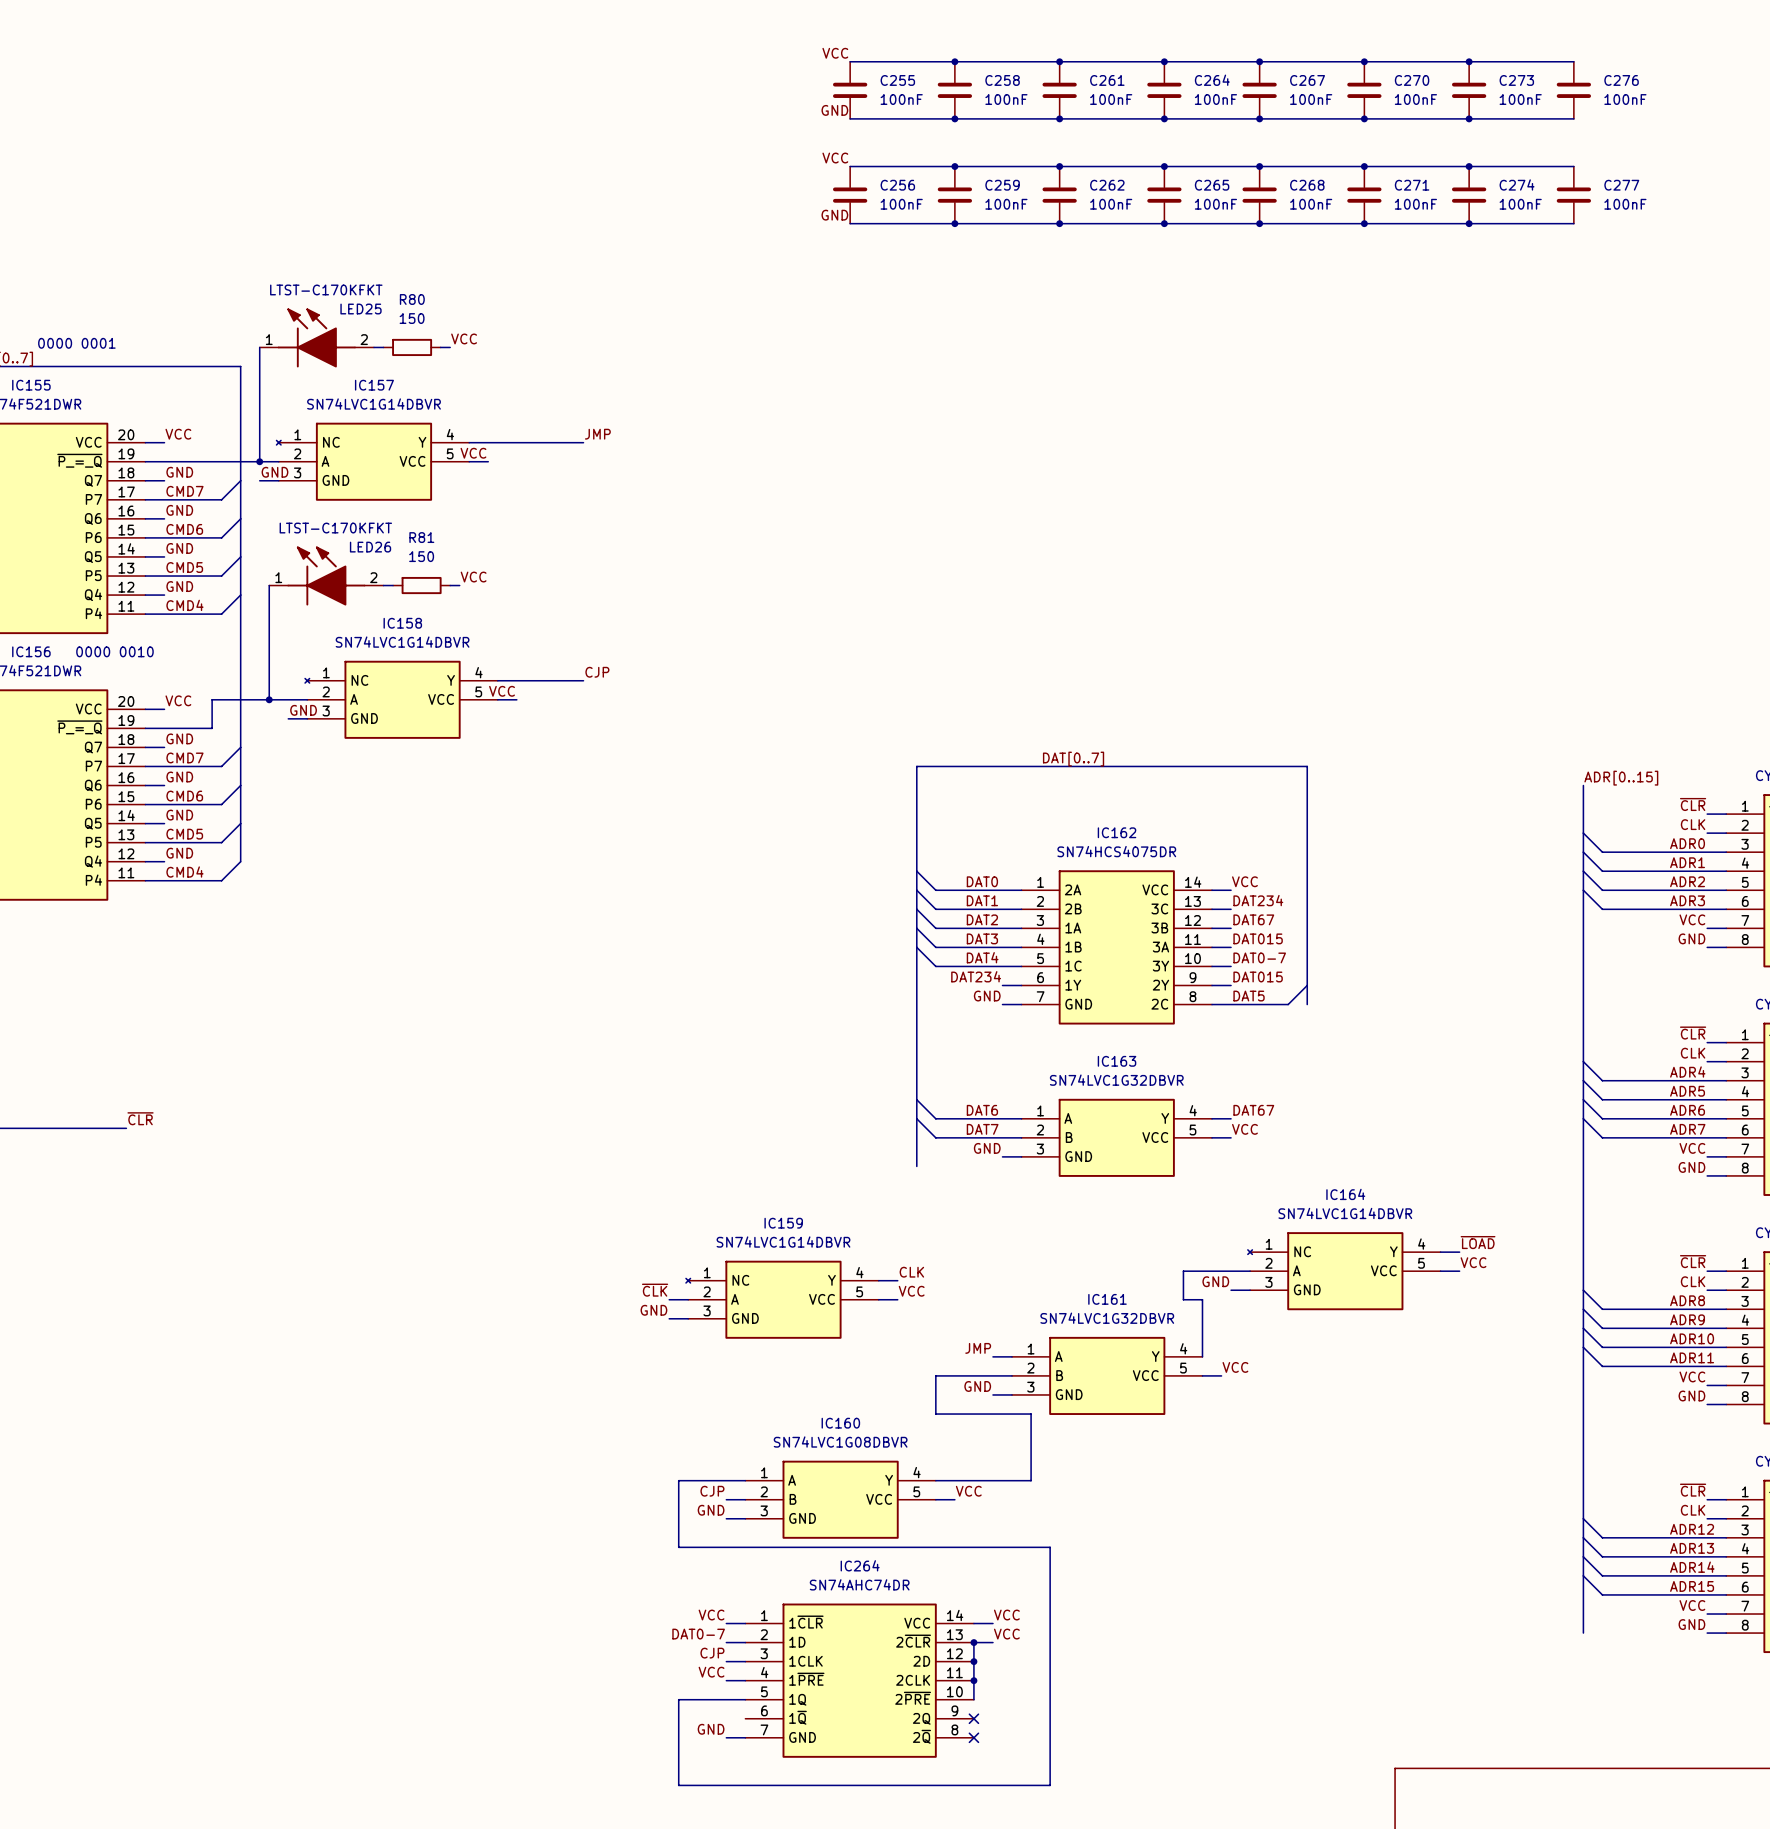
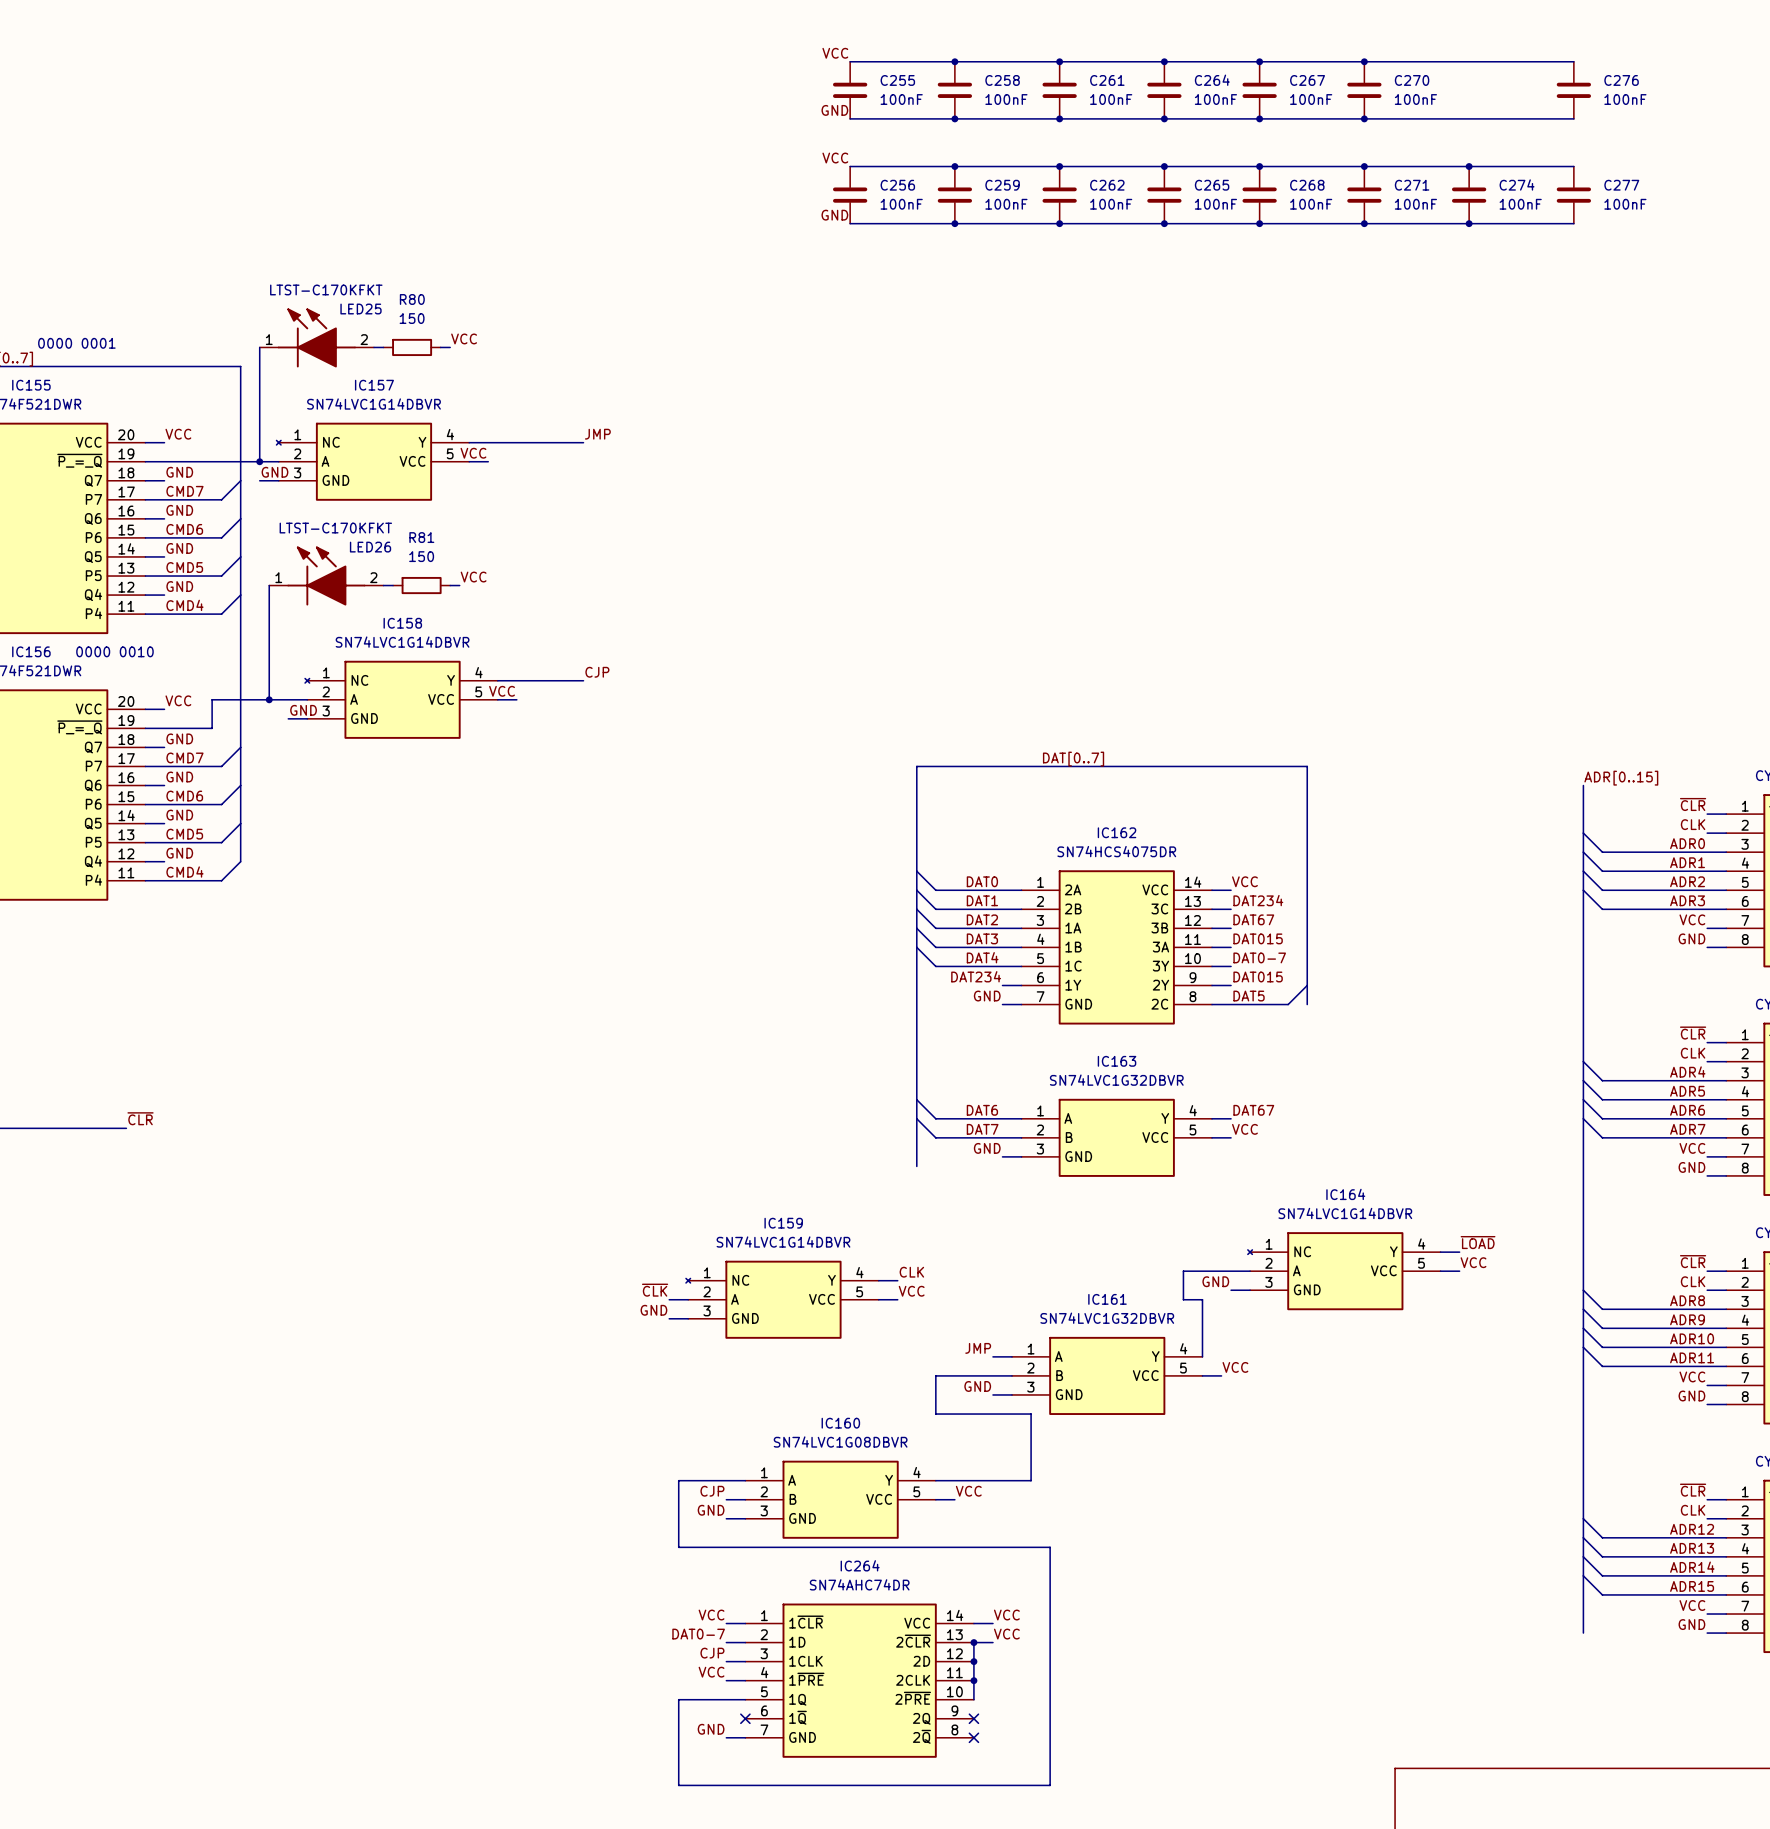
junction: (1469, 61) -> none
C273: 100nF (1469, 90) -> none
junction: (1469, 118) -> none
no-connect mark: none -> (745, 1718)

